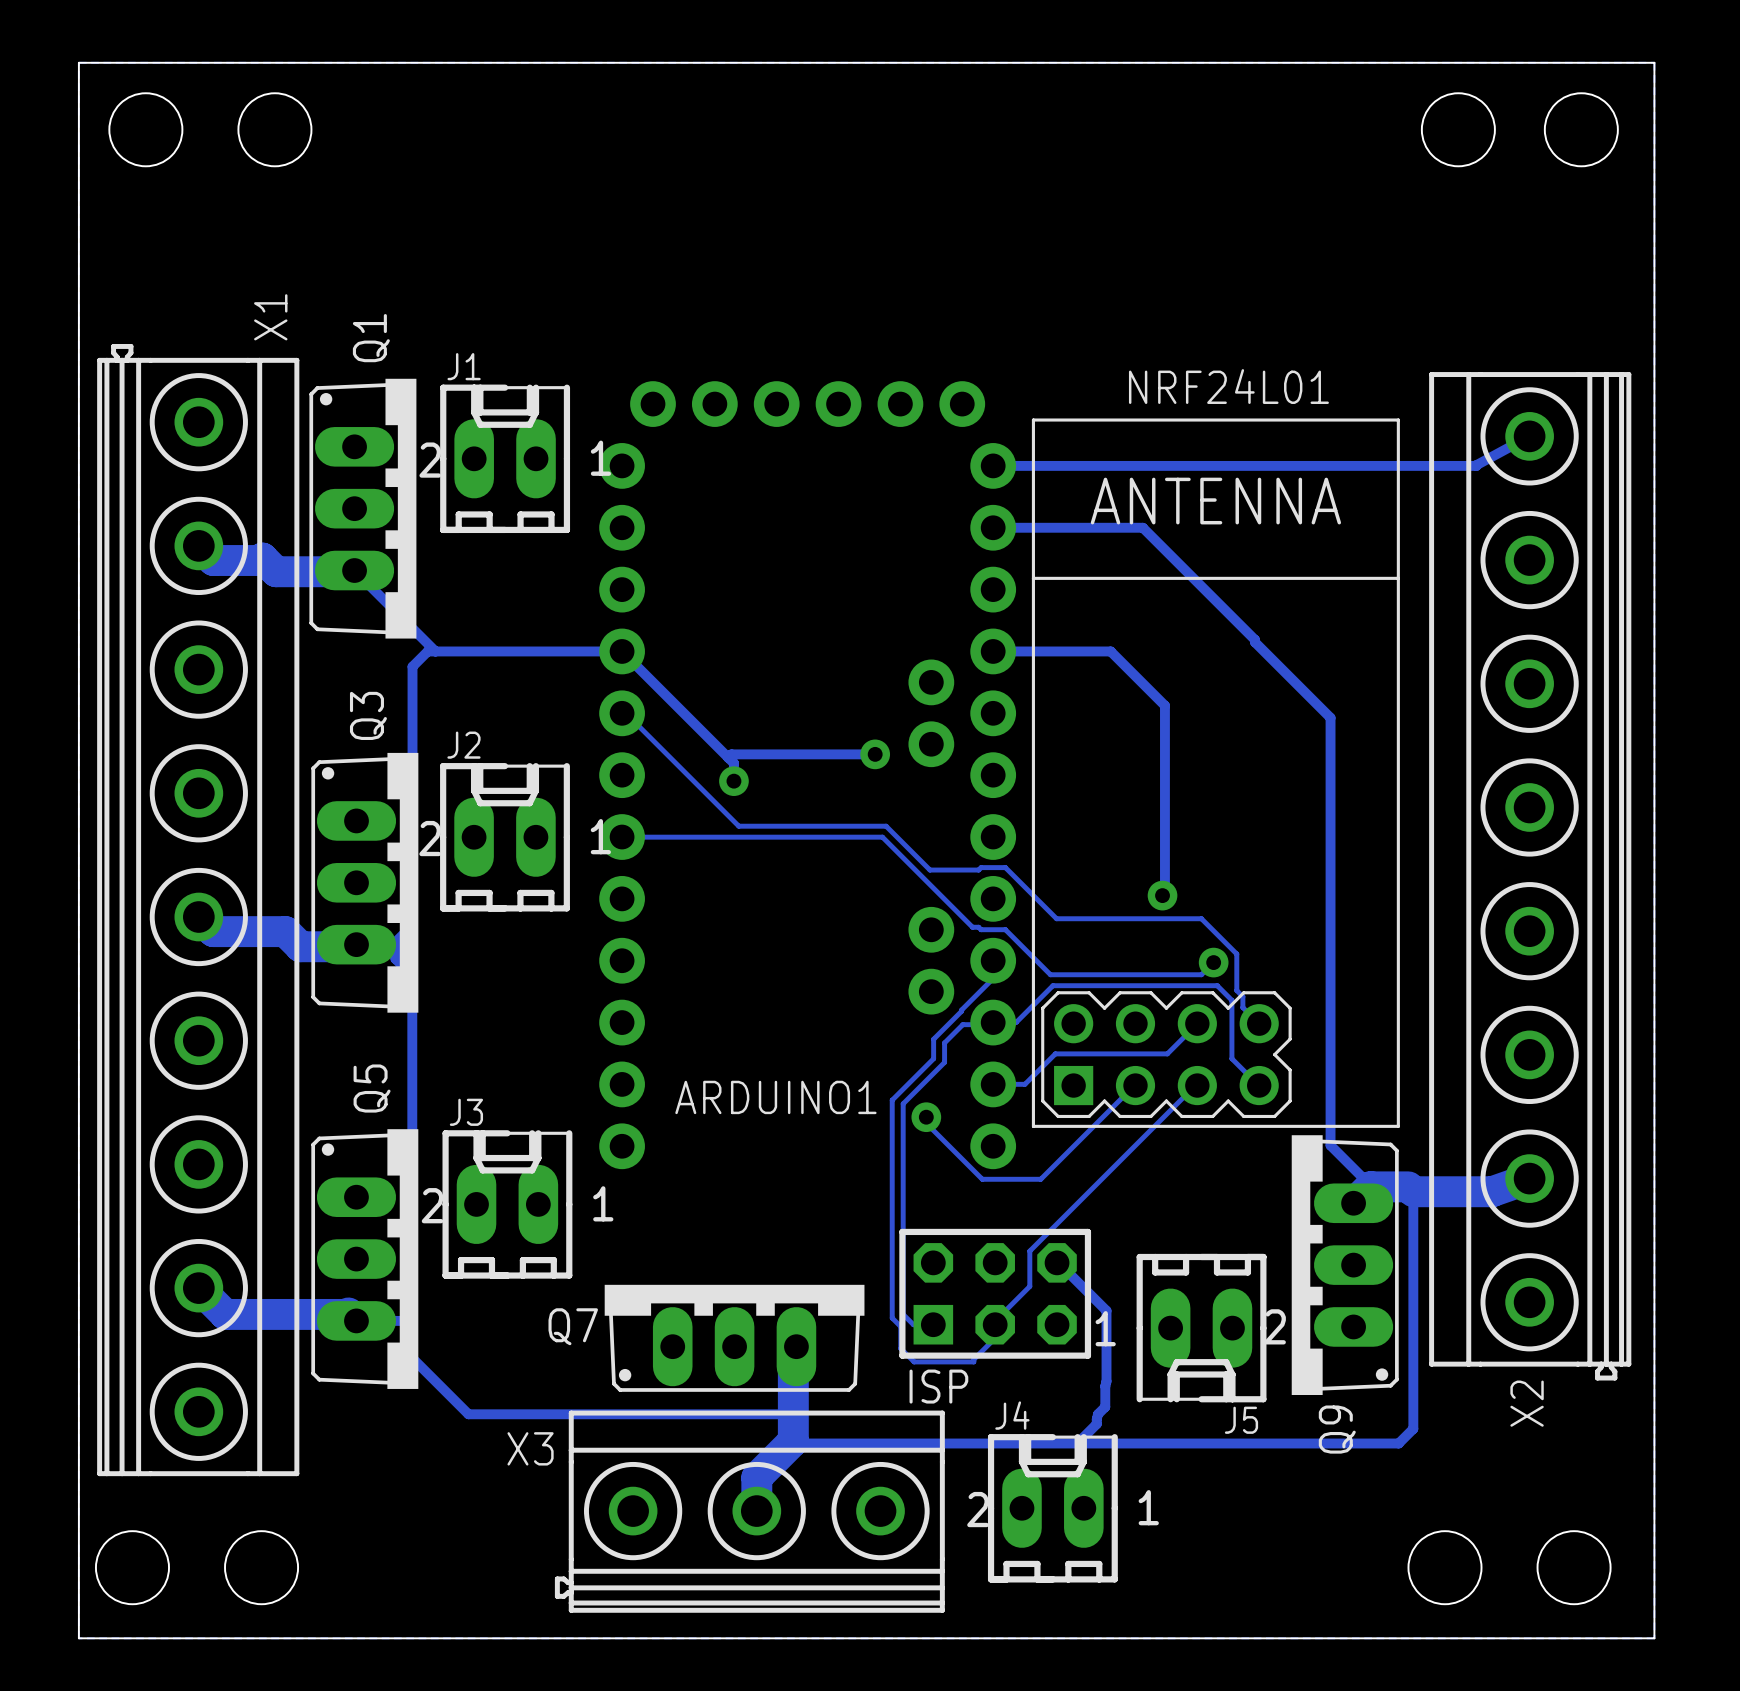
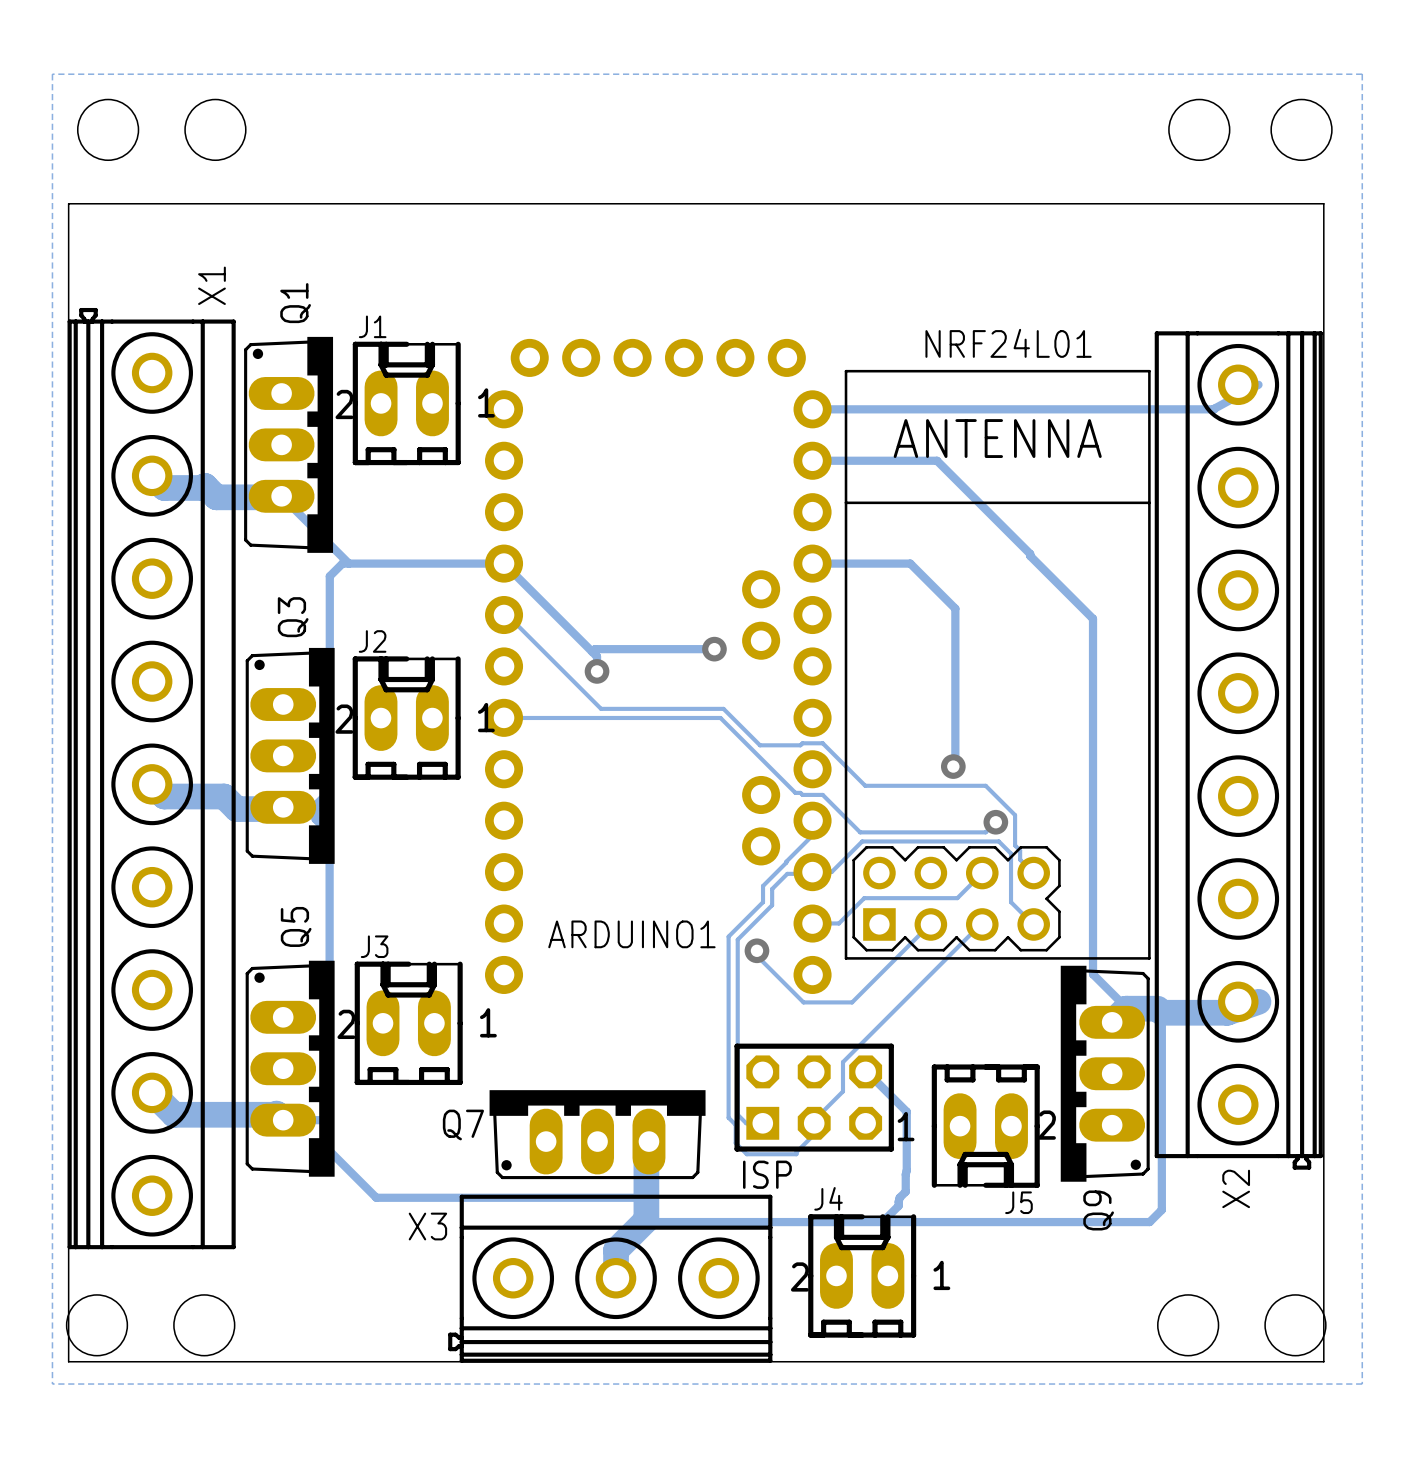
board edge: (1654, 62) (78, 62) (78, 1638) (1654, 1638) (1654, 62) -> (1323, 203) (1323, 1361) (68, 1361) (68, 203) (1323, 203)
X2 position: (1530, 876) -> (1238, 750)

